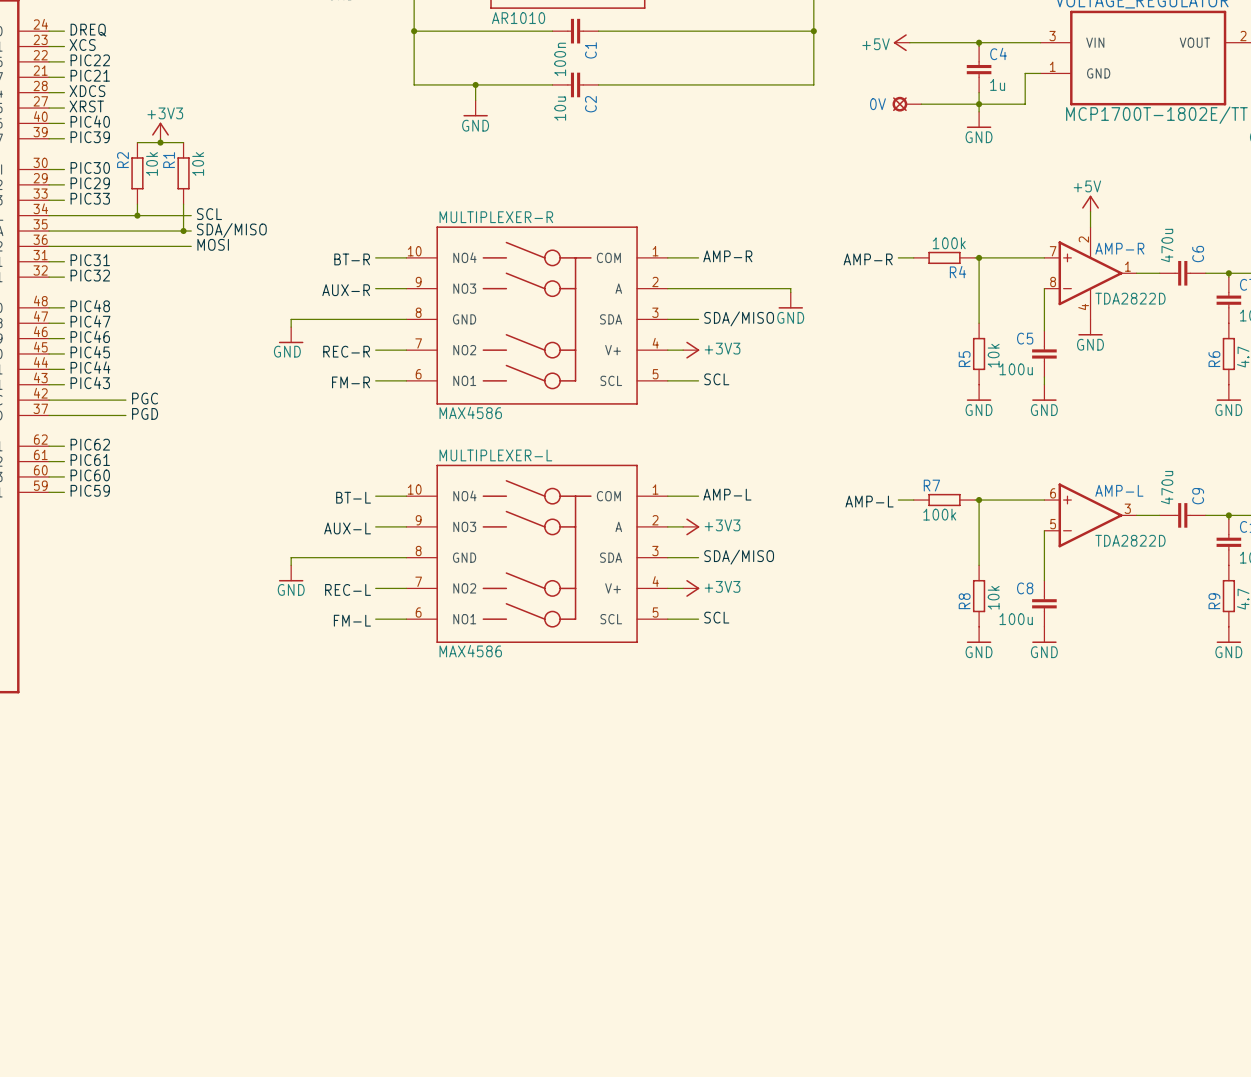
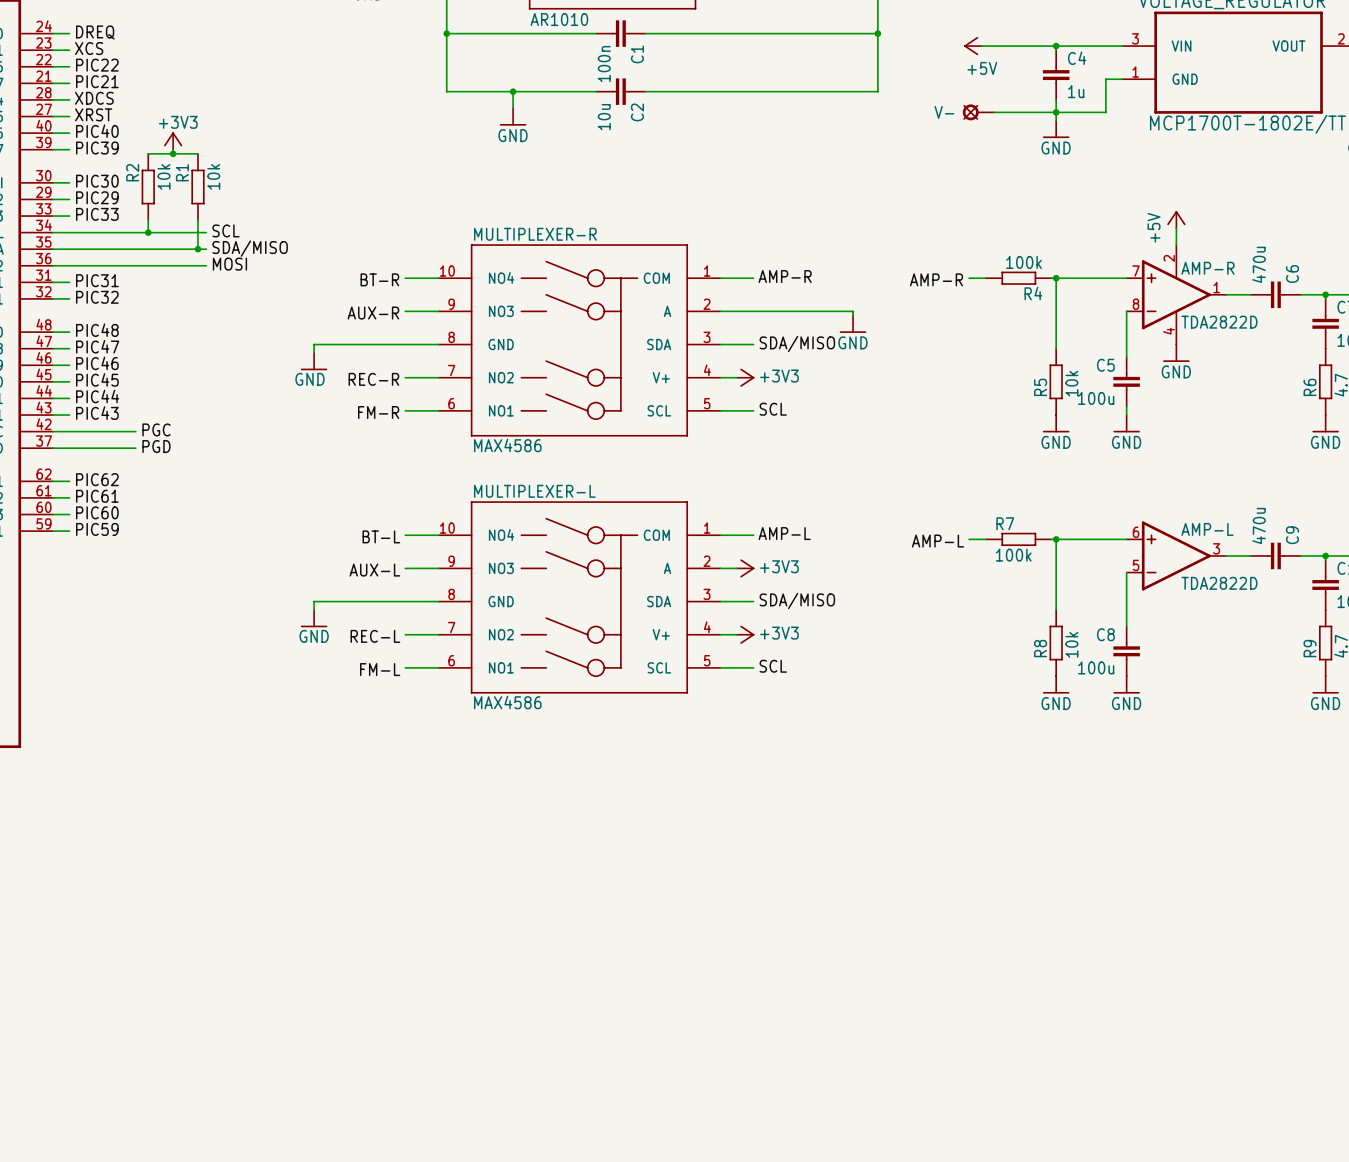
power symbol text position: +5V (876, 44) -> +5V (982, 68)
0V name: 0V (877, 104) -> V- (944, 112)
power symbol text rotation: 0° (1087, 186) -> 90° counterclockwise (1154, 227)

